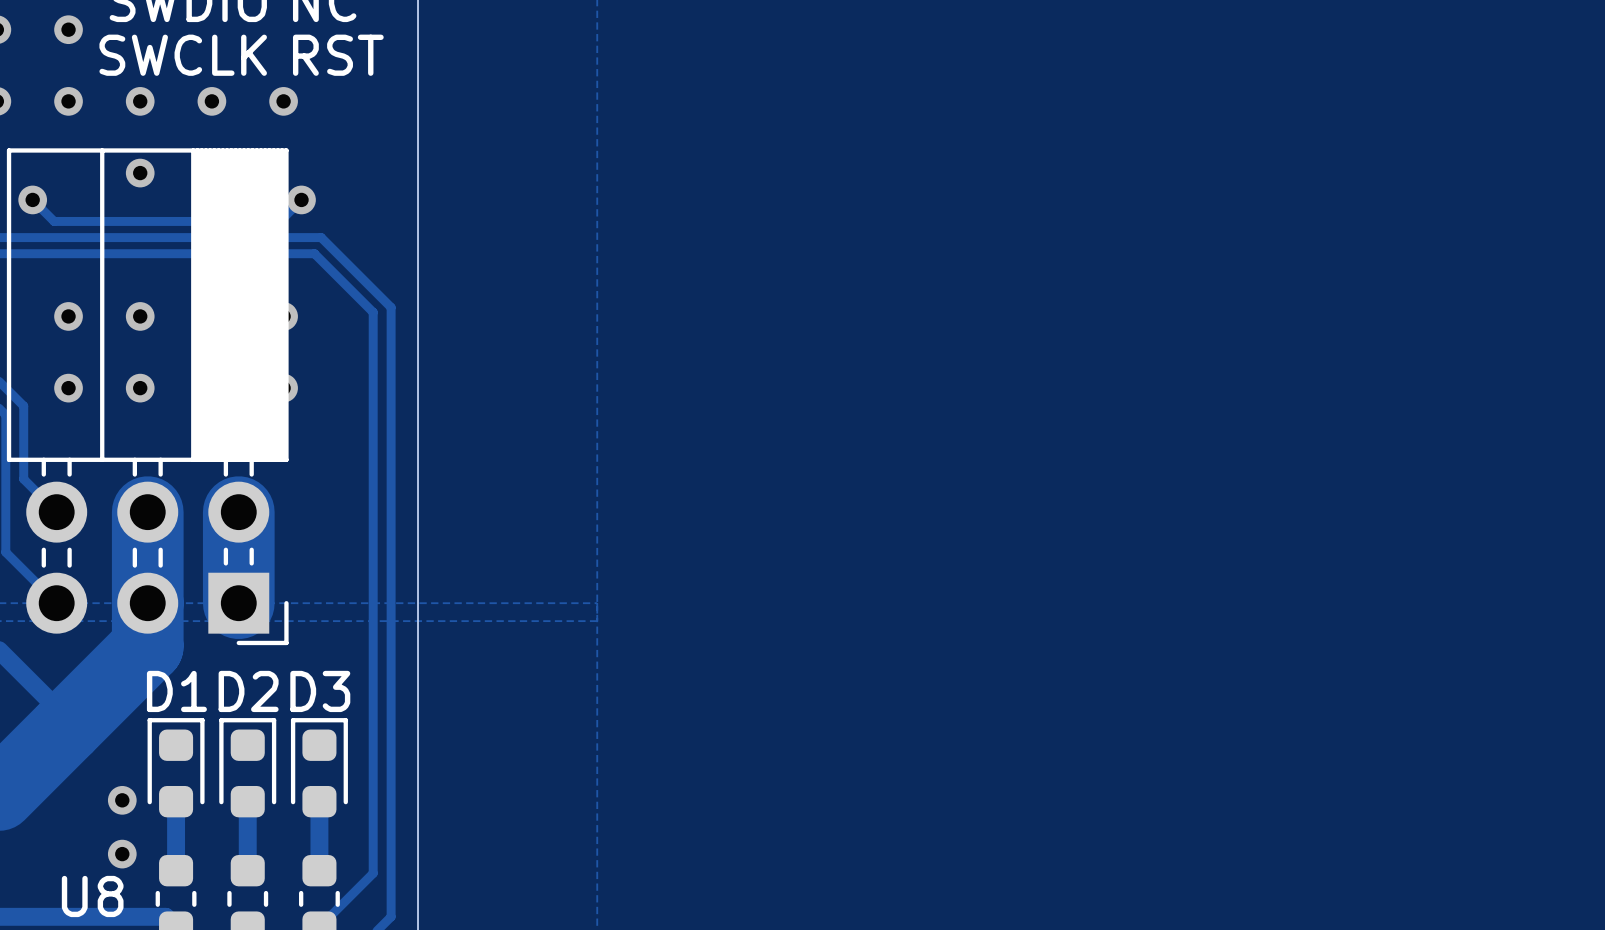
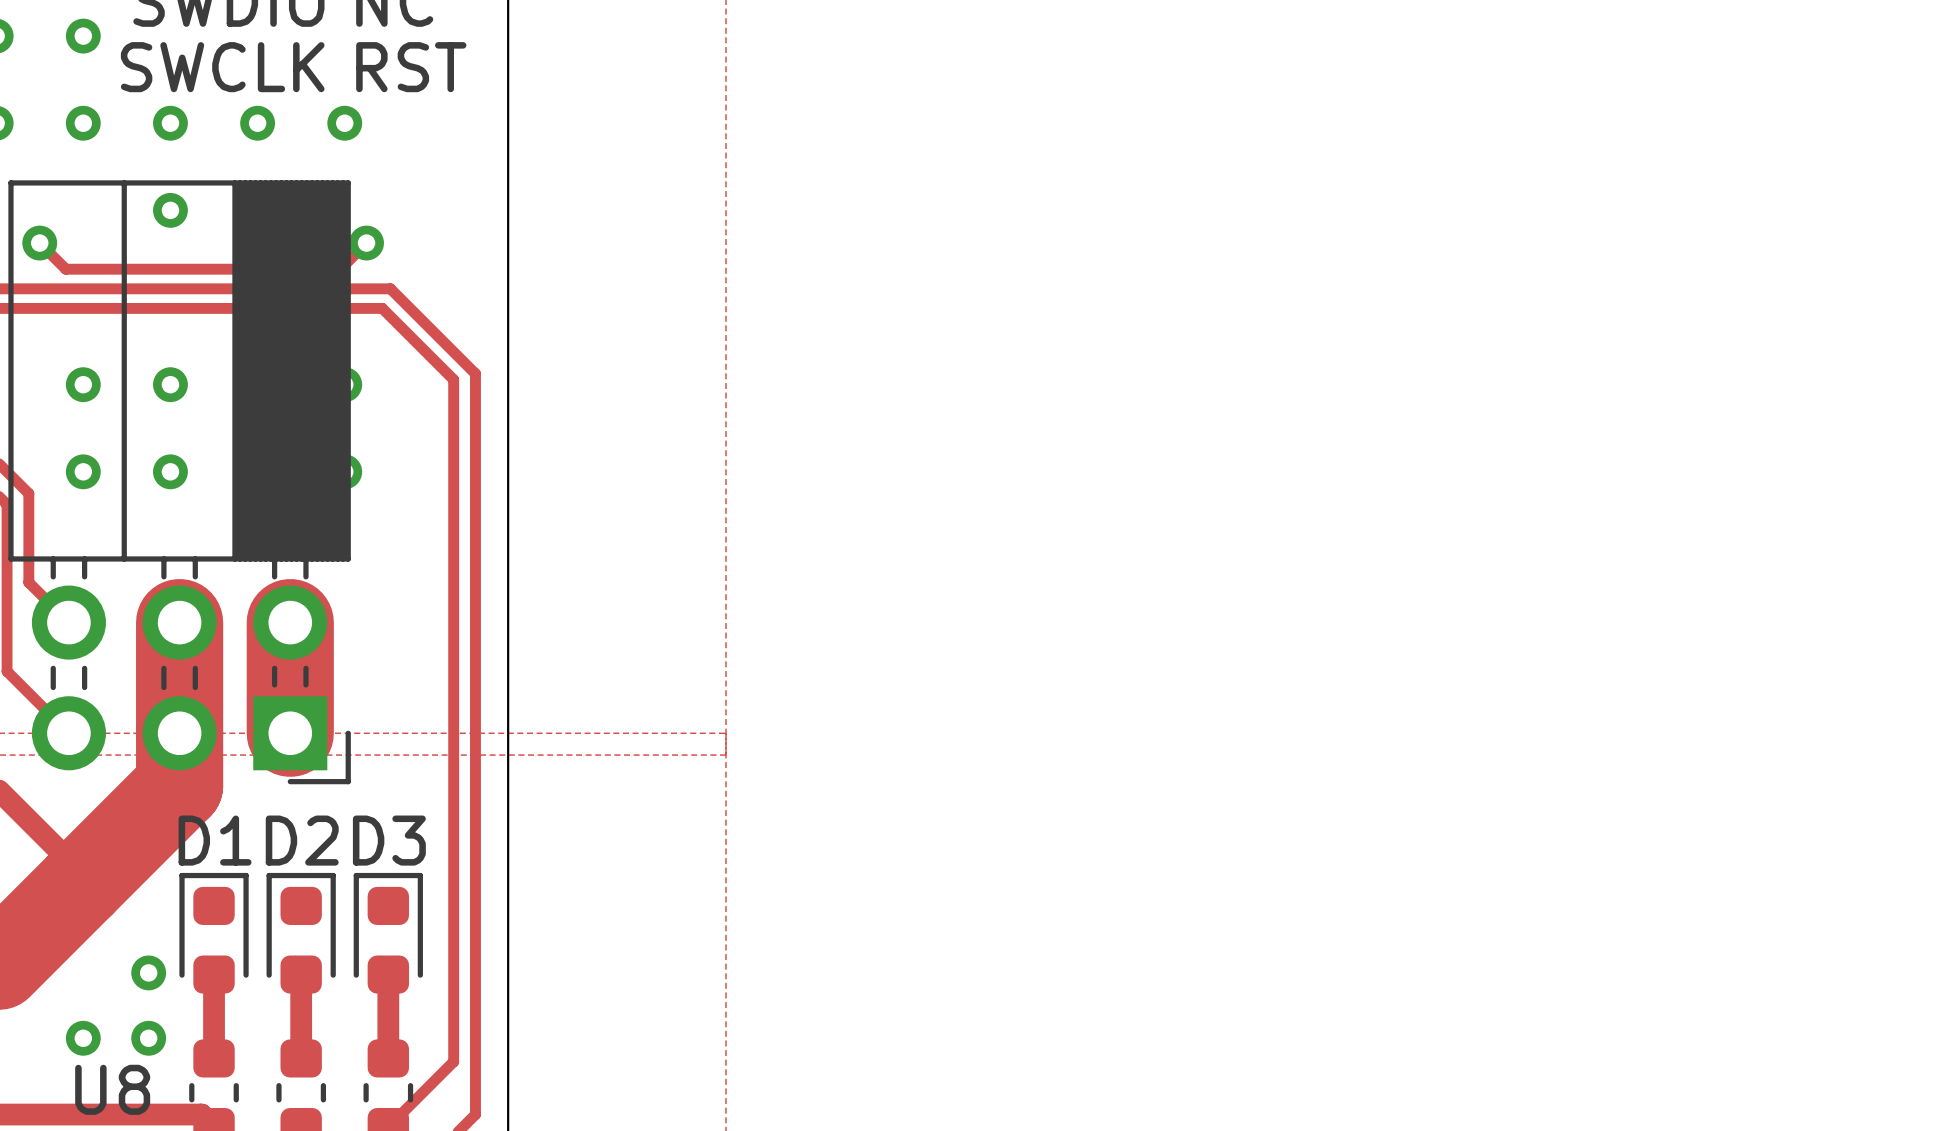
via: none -> (83, 1038)

